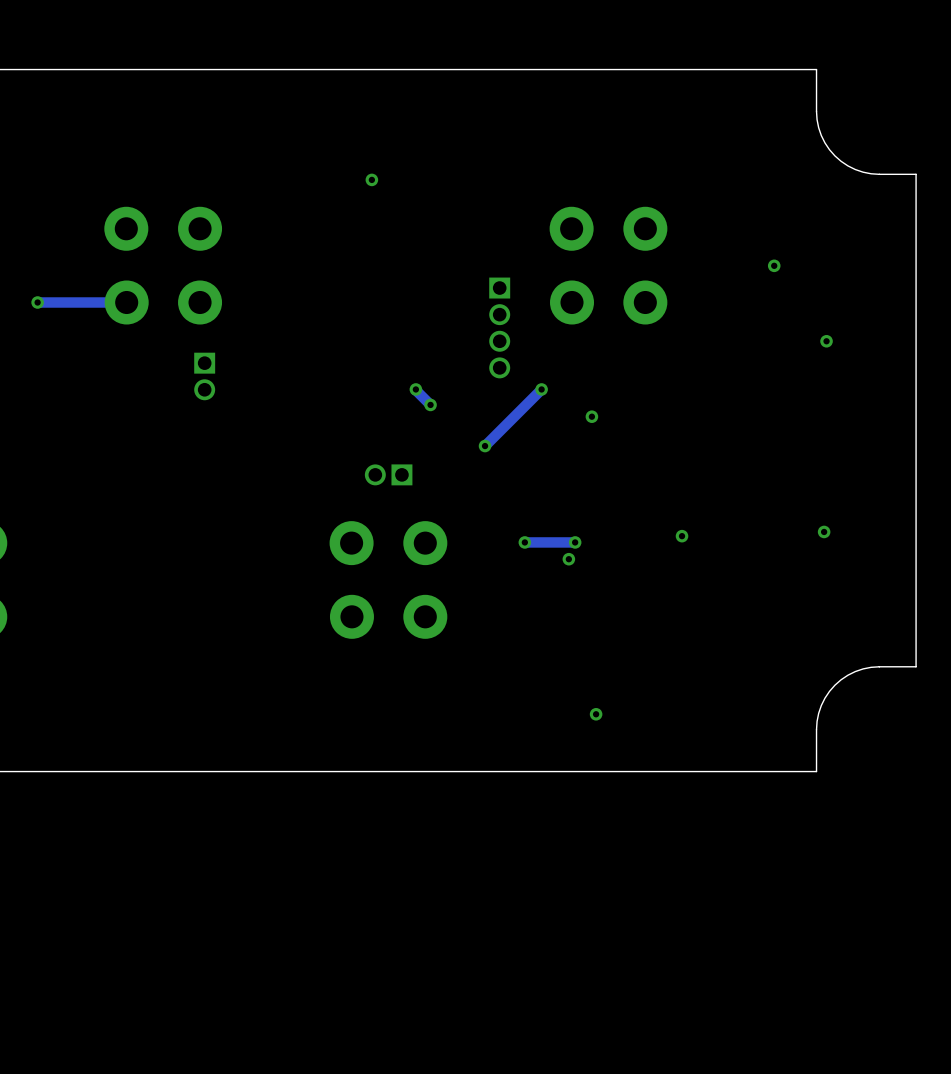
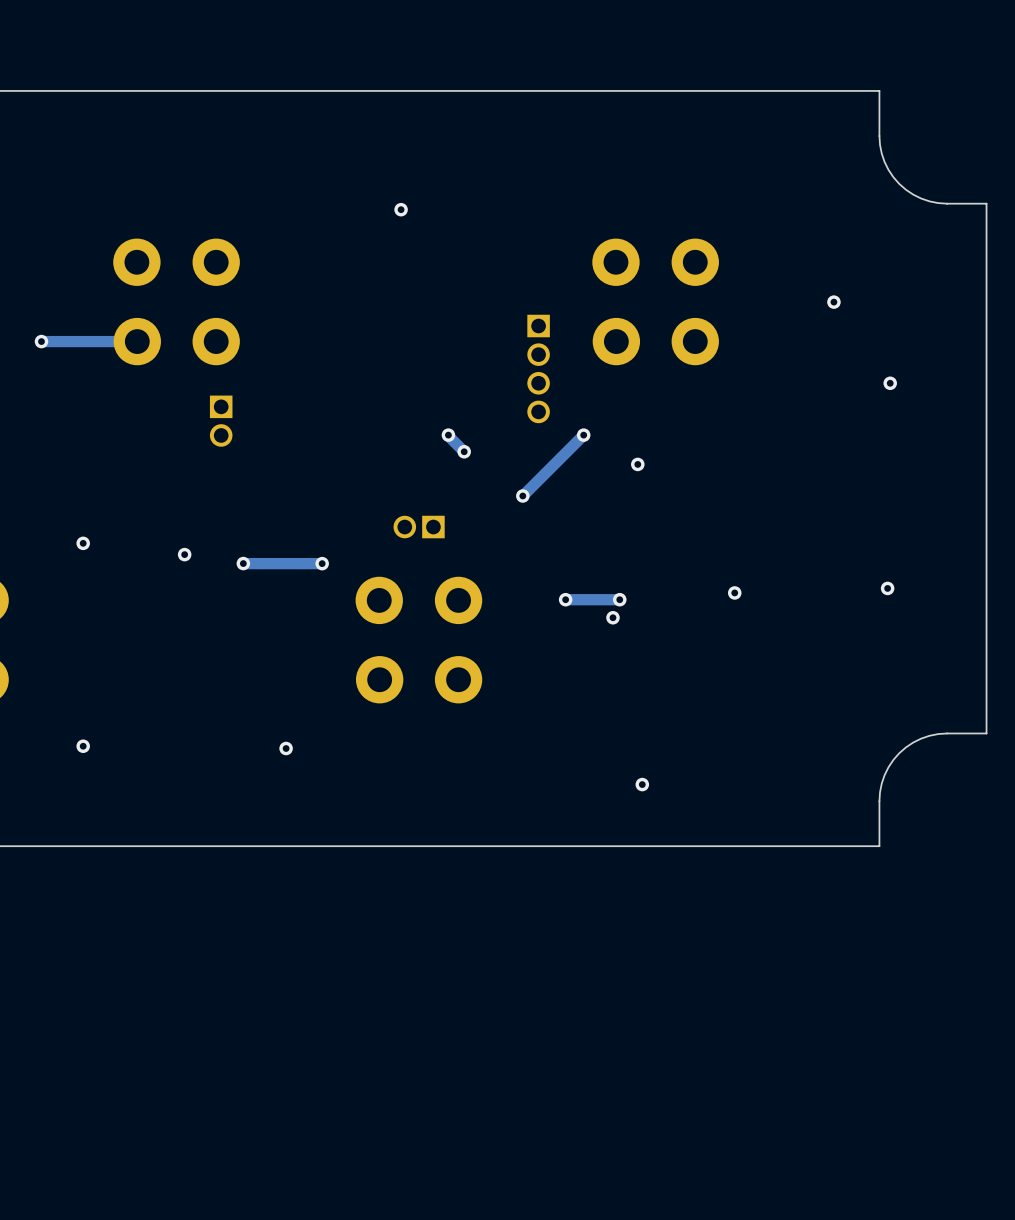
via: none -> (83, 543)
via: none -> (184, 554)
via: none -> (243, 563)
track: none -> (322, 563) (243, 563)
via: none -> (322, 563)
via: none -> (83, 746)
via: none -> (286, 748)

